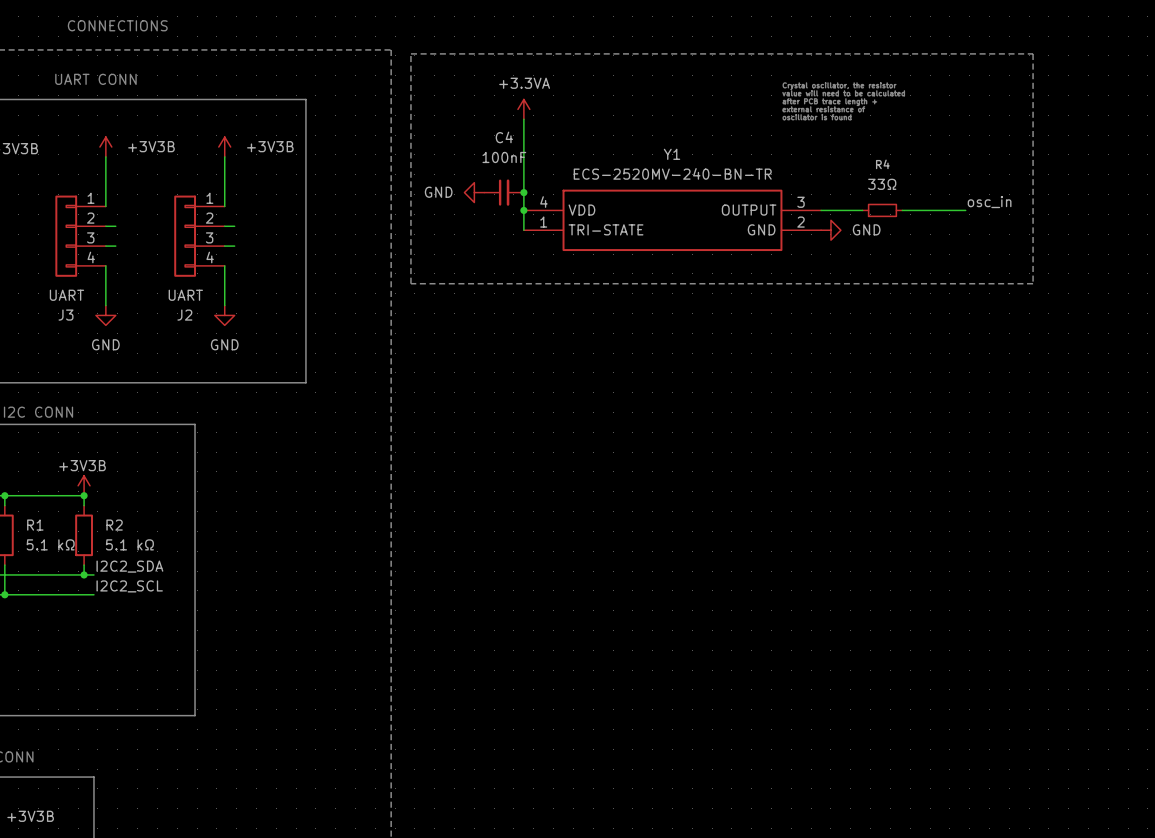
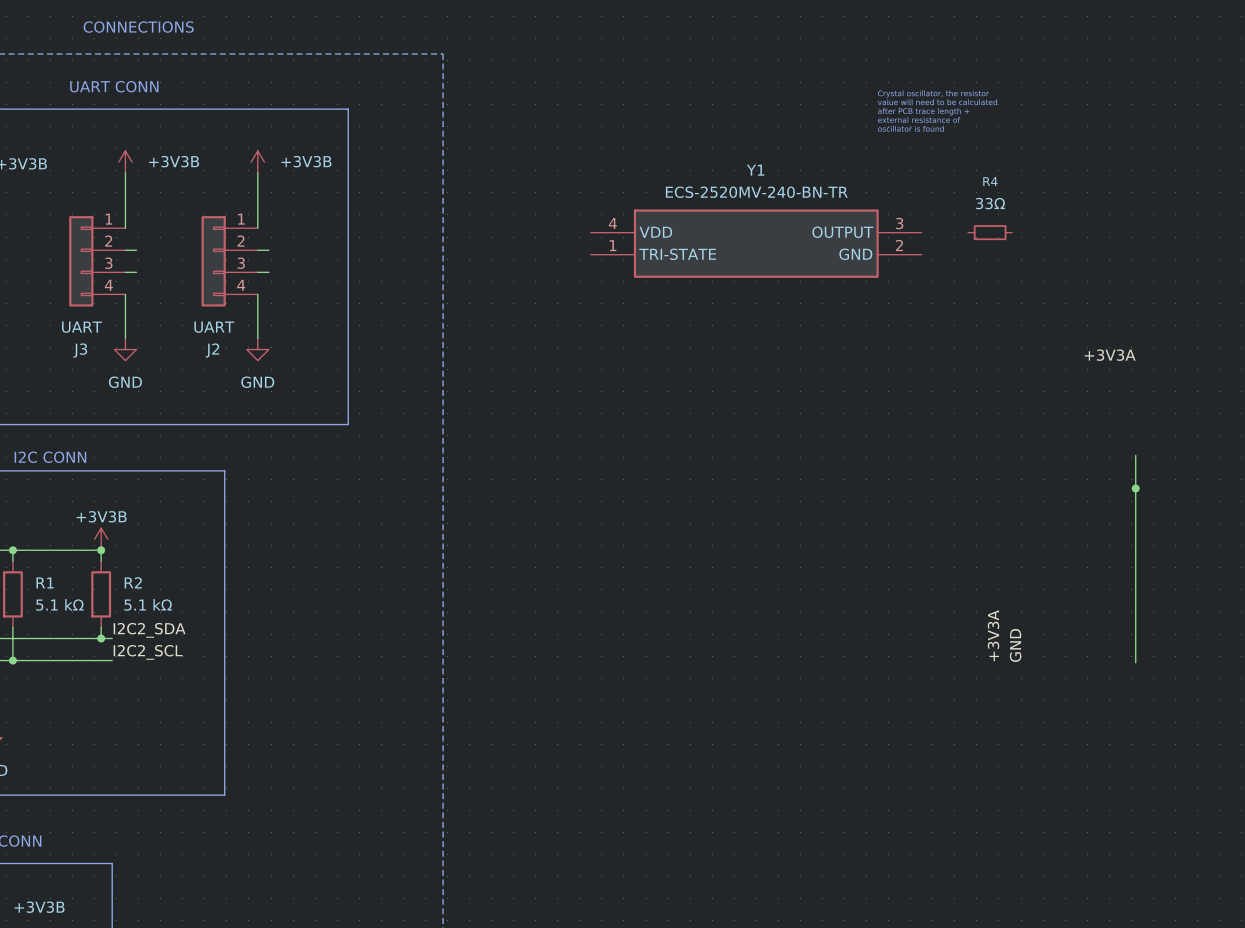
line: (410, 53) (1033, 53) (1033, 283) (410, 283) (410, 53) -> none
power symbol: +3.3VA (523, 109) -> none
wire: (523, 119) (523, 230) -> none
power symbol: GND (474, 192) -> none
C4: 100nF (504, 192) -> none
junction: (523, 192) -> none
label: osc_in (989, 202) -> none
junction: (523, 210) -> none
wire: (821, 210) (862, 210) -> none
wire: (902, 210) (965, 210) -> none
power symbol: GND (830, 230) -> none
label: none -> +3V3A (1110, 355)
wire: none -> (1135, 455) (1135, 662)
junction: none -> (1135, 488)
label: none -> +3V3A (993, 635)
label: none -> GND (1015, 645)

